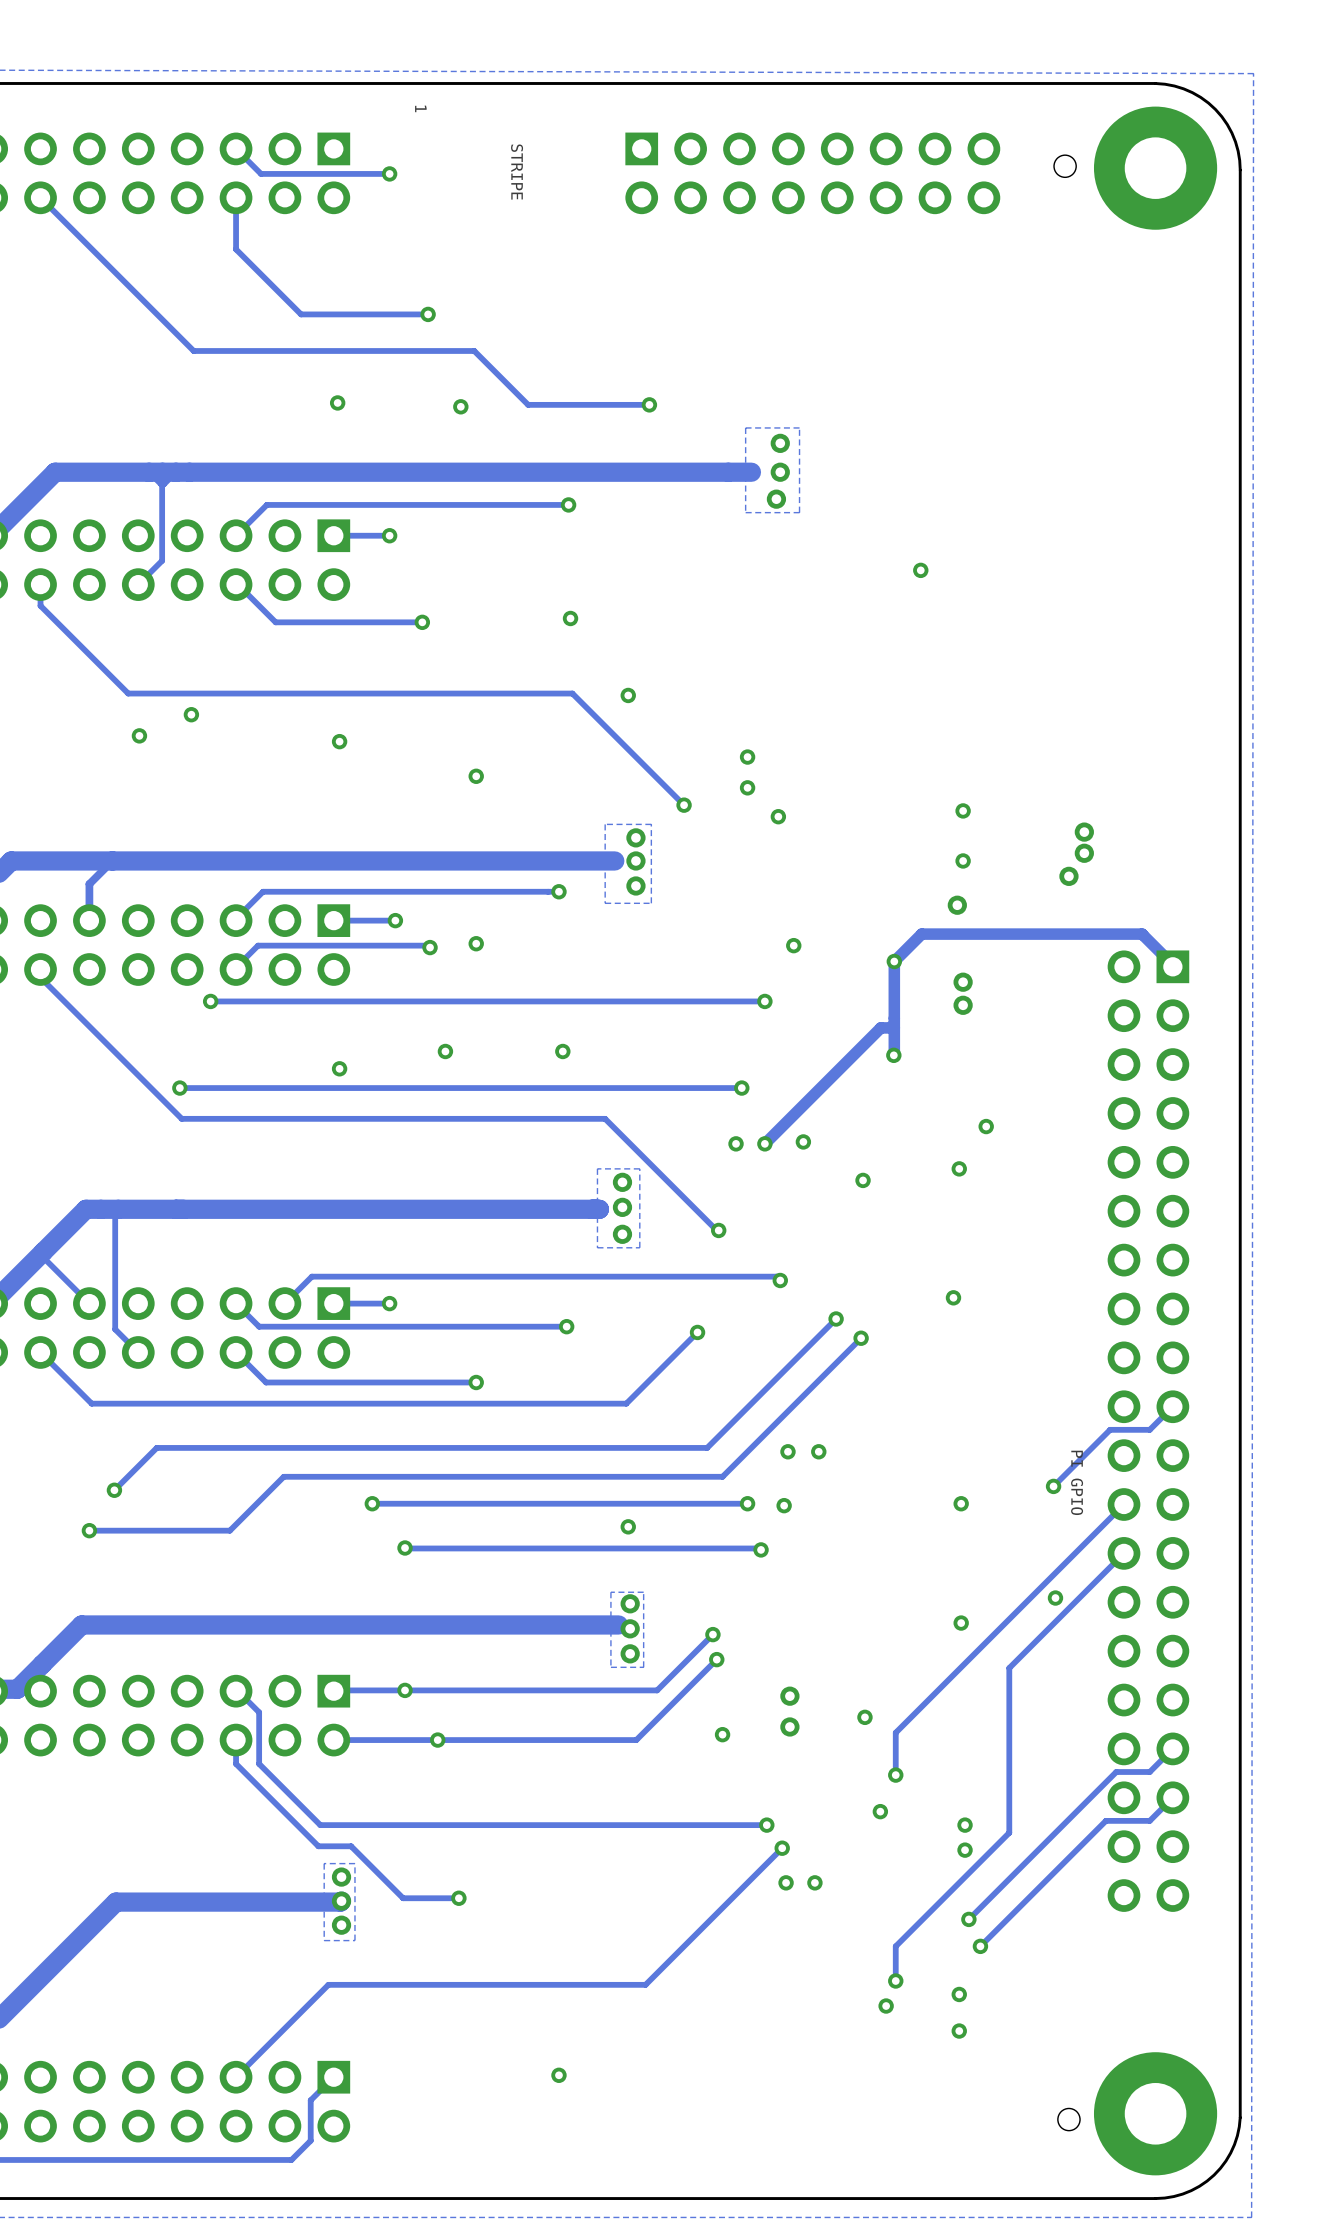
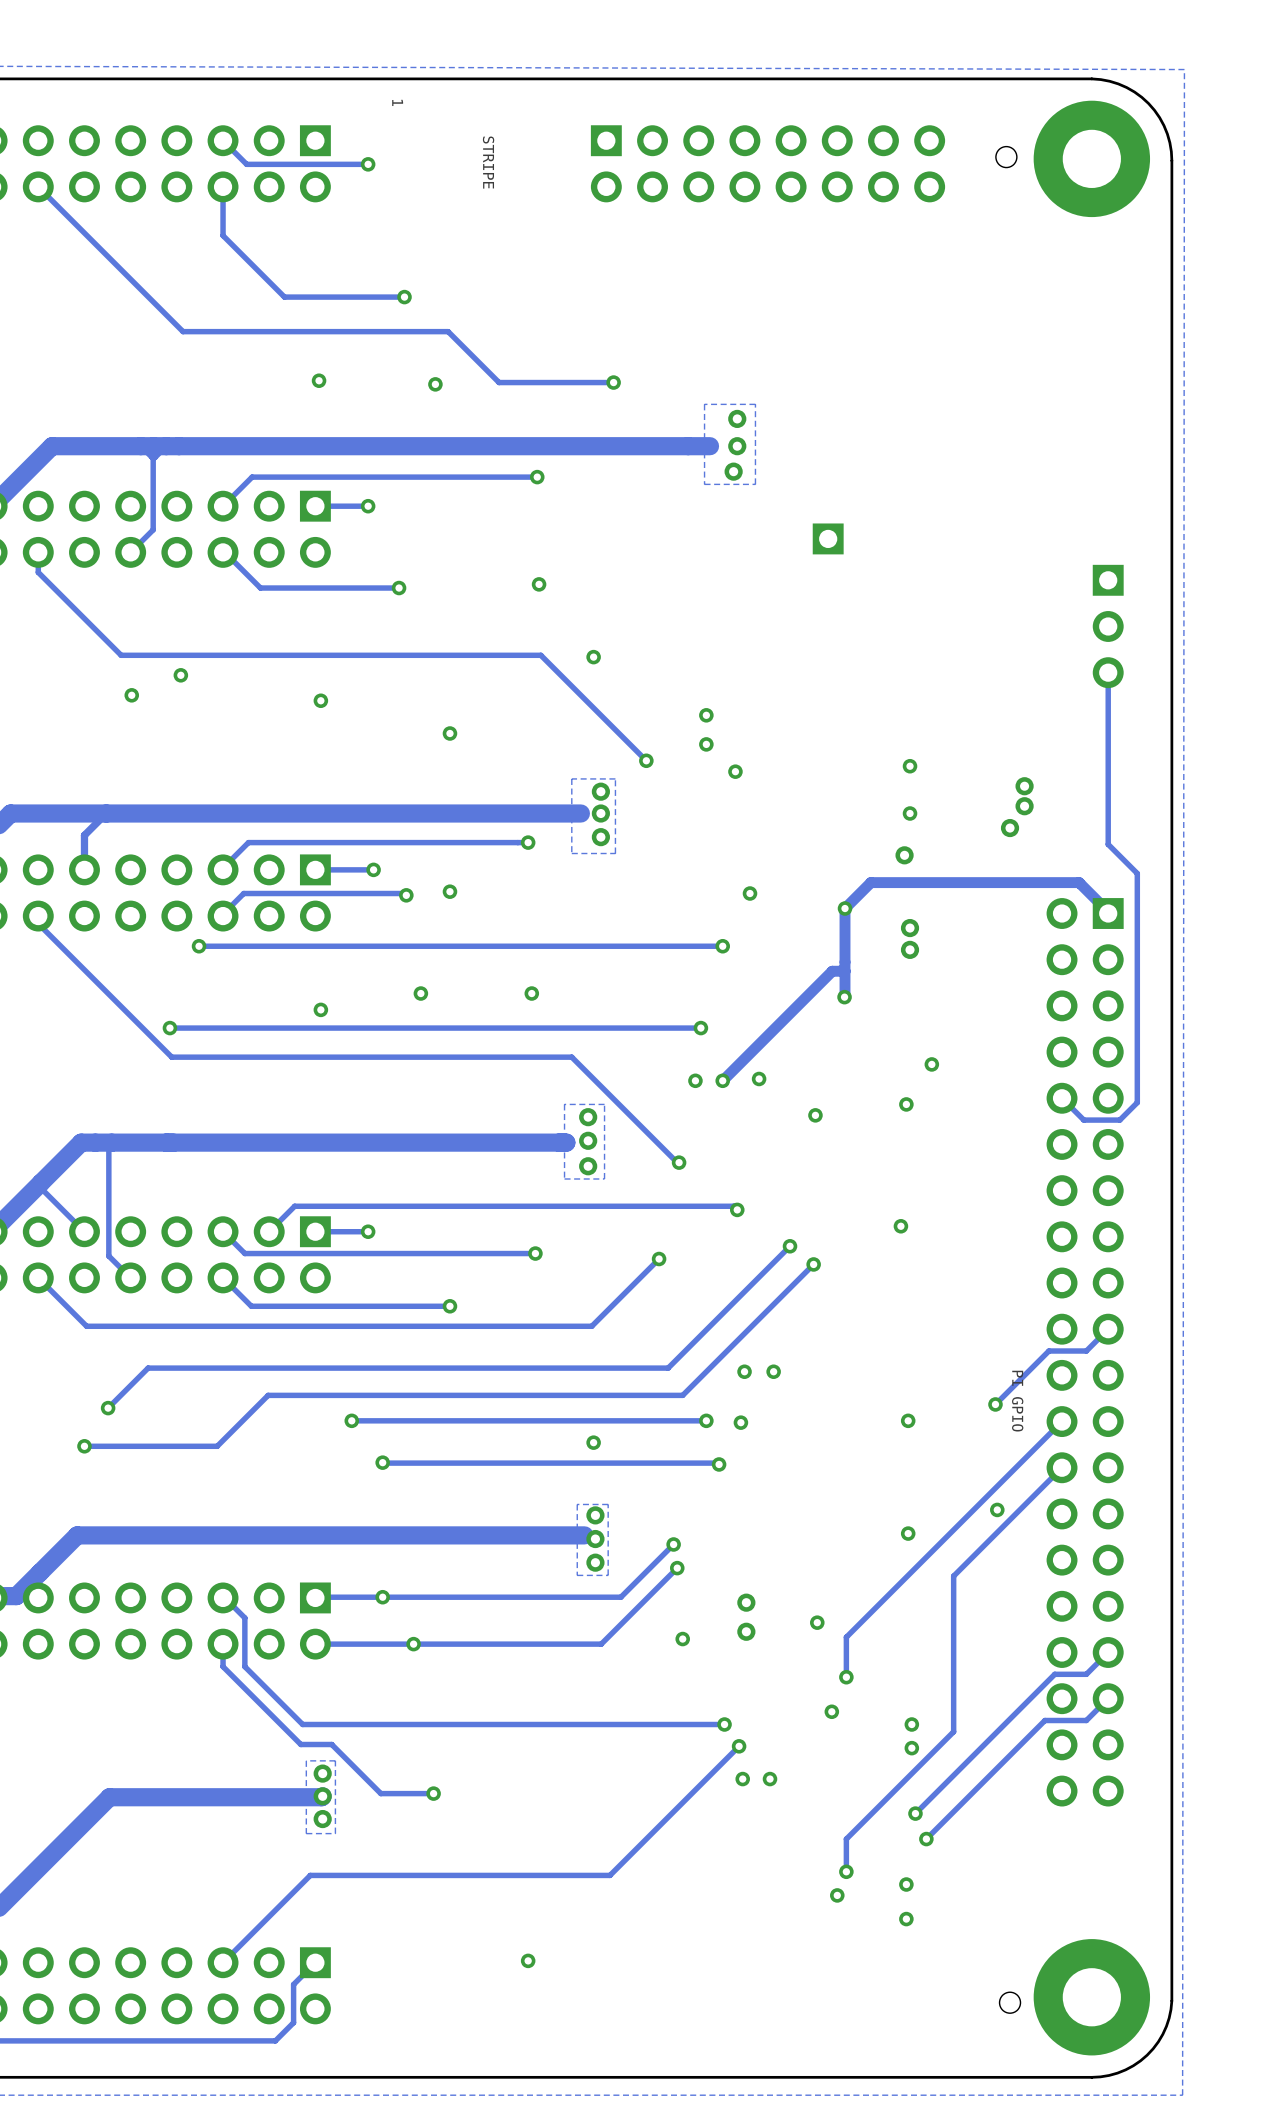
part: none -> (828, 538)
via: (920, 570) -> none
part: none -> (1108, 626)
track: none -> (1108, 672) (1108, 844) (1137, 873) (1137, 1102) (1119, 1120) (1083, 1120) (1062, 1098)

